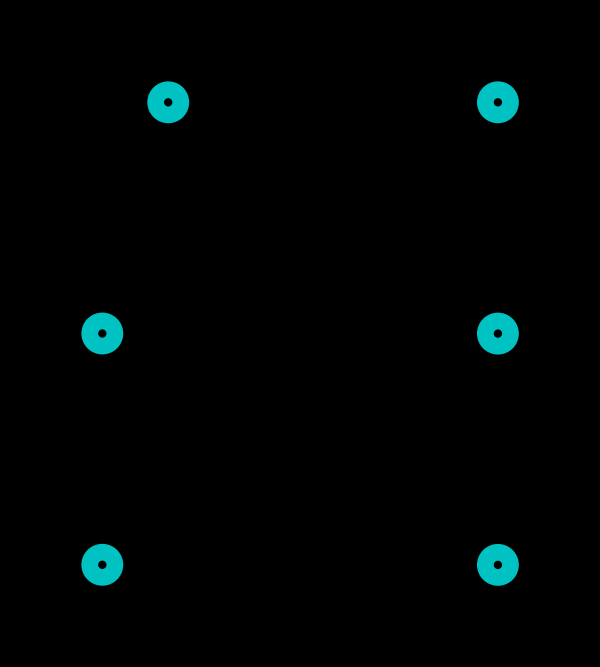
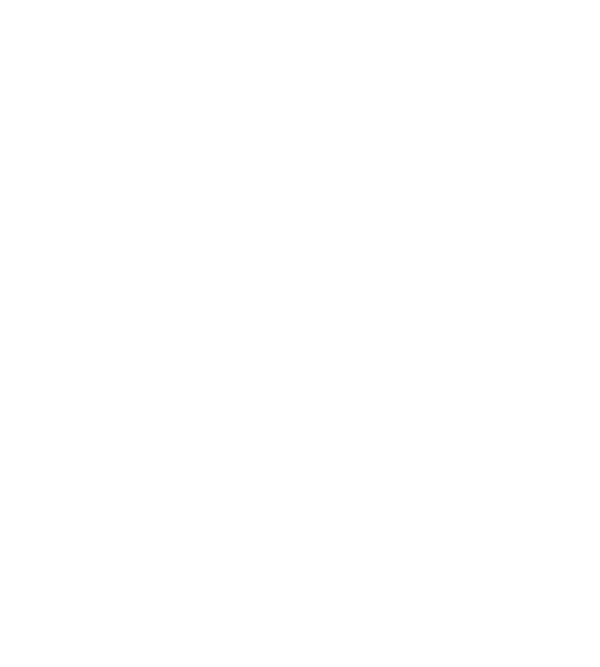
part: (168, 102) -> none
part: (497, 102) -> none
part: (102, 333) -> none
part: (497, 333) -> none
part: (102, 564) -> none
part: (497, 564) -> none

